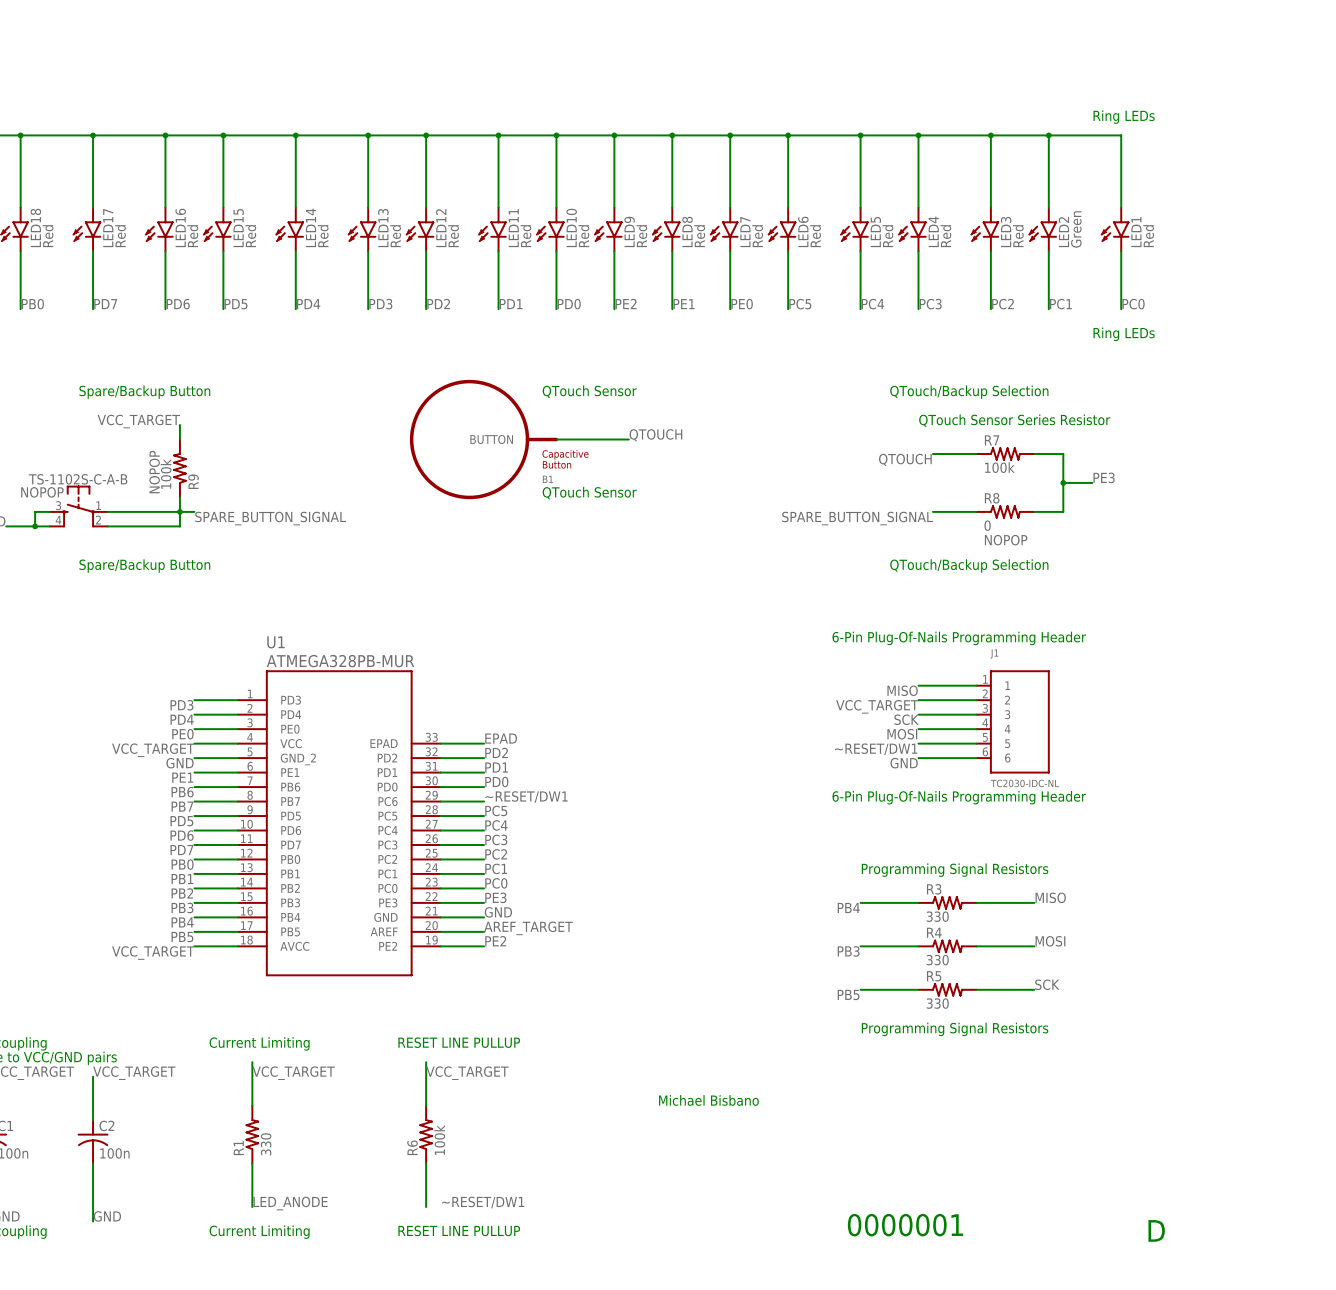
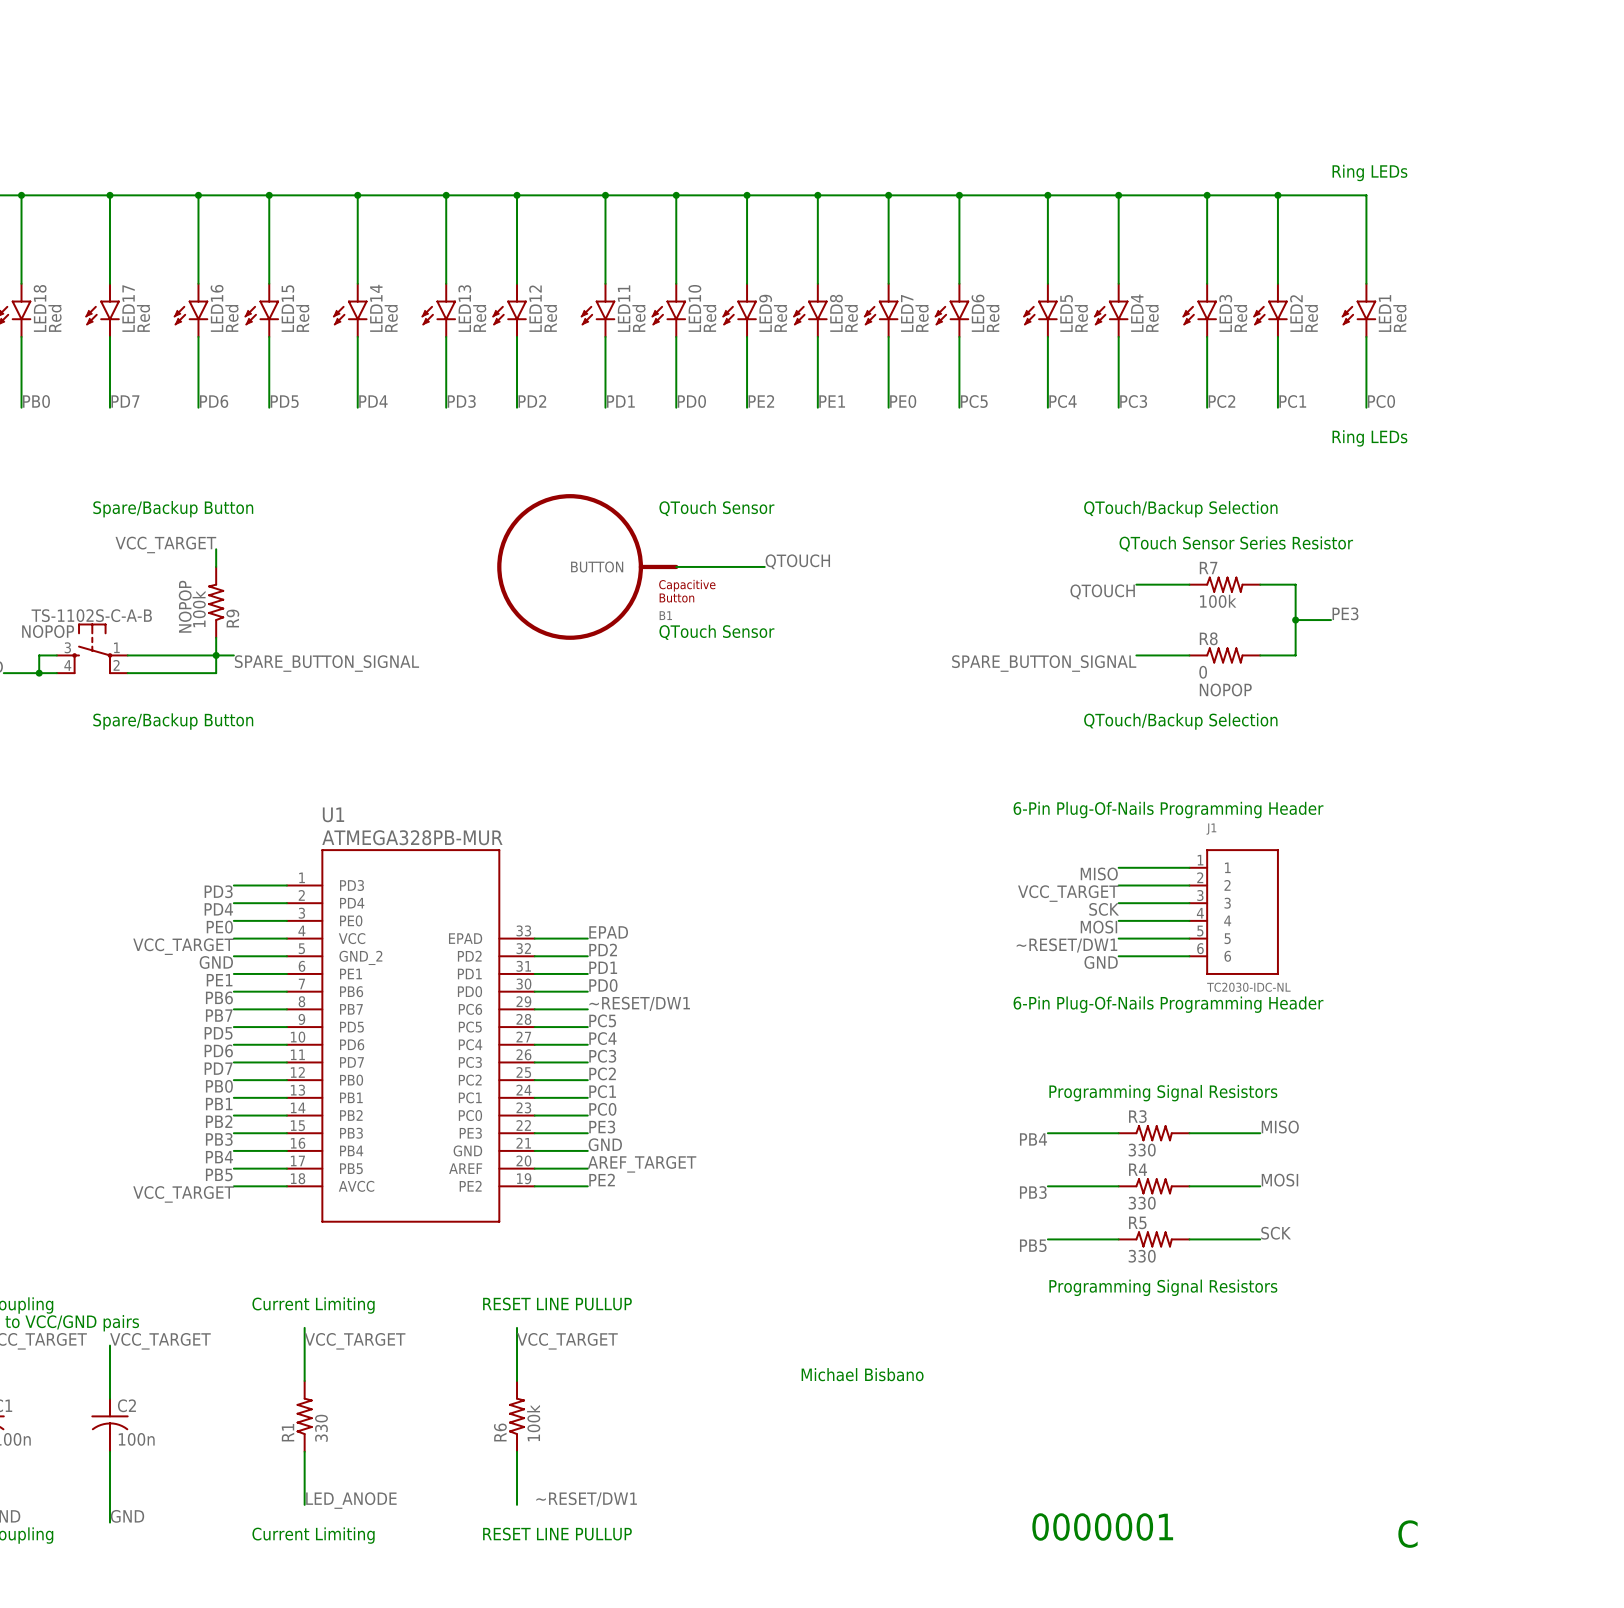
LED2 value: Green (1076, 229) -> Red (1311, 318)
text: D (1156, 1230) -> C (1407, 1534)

